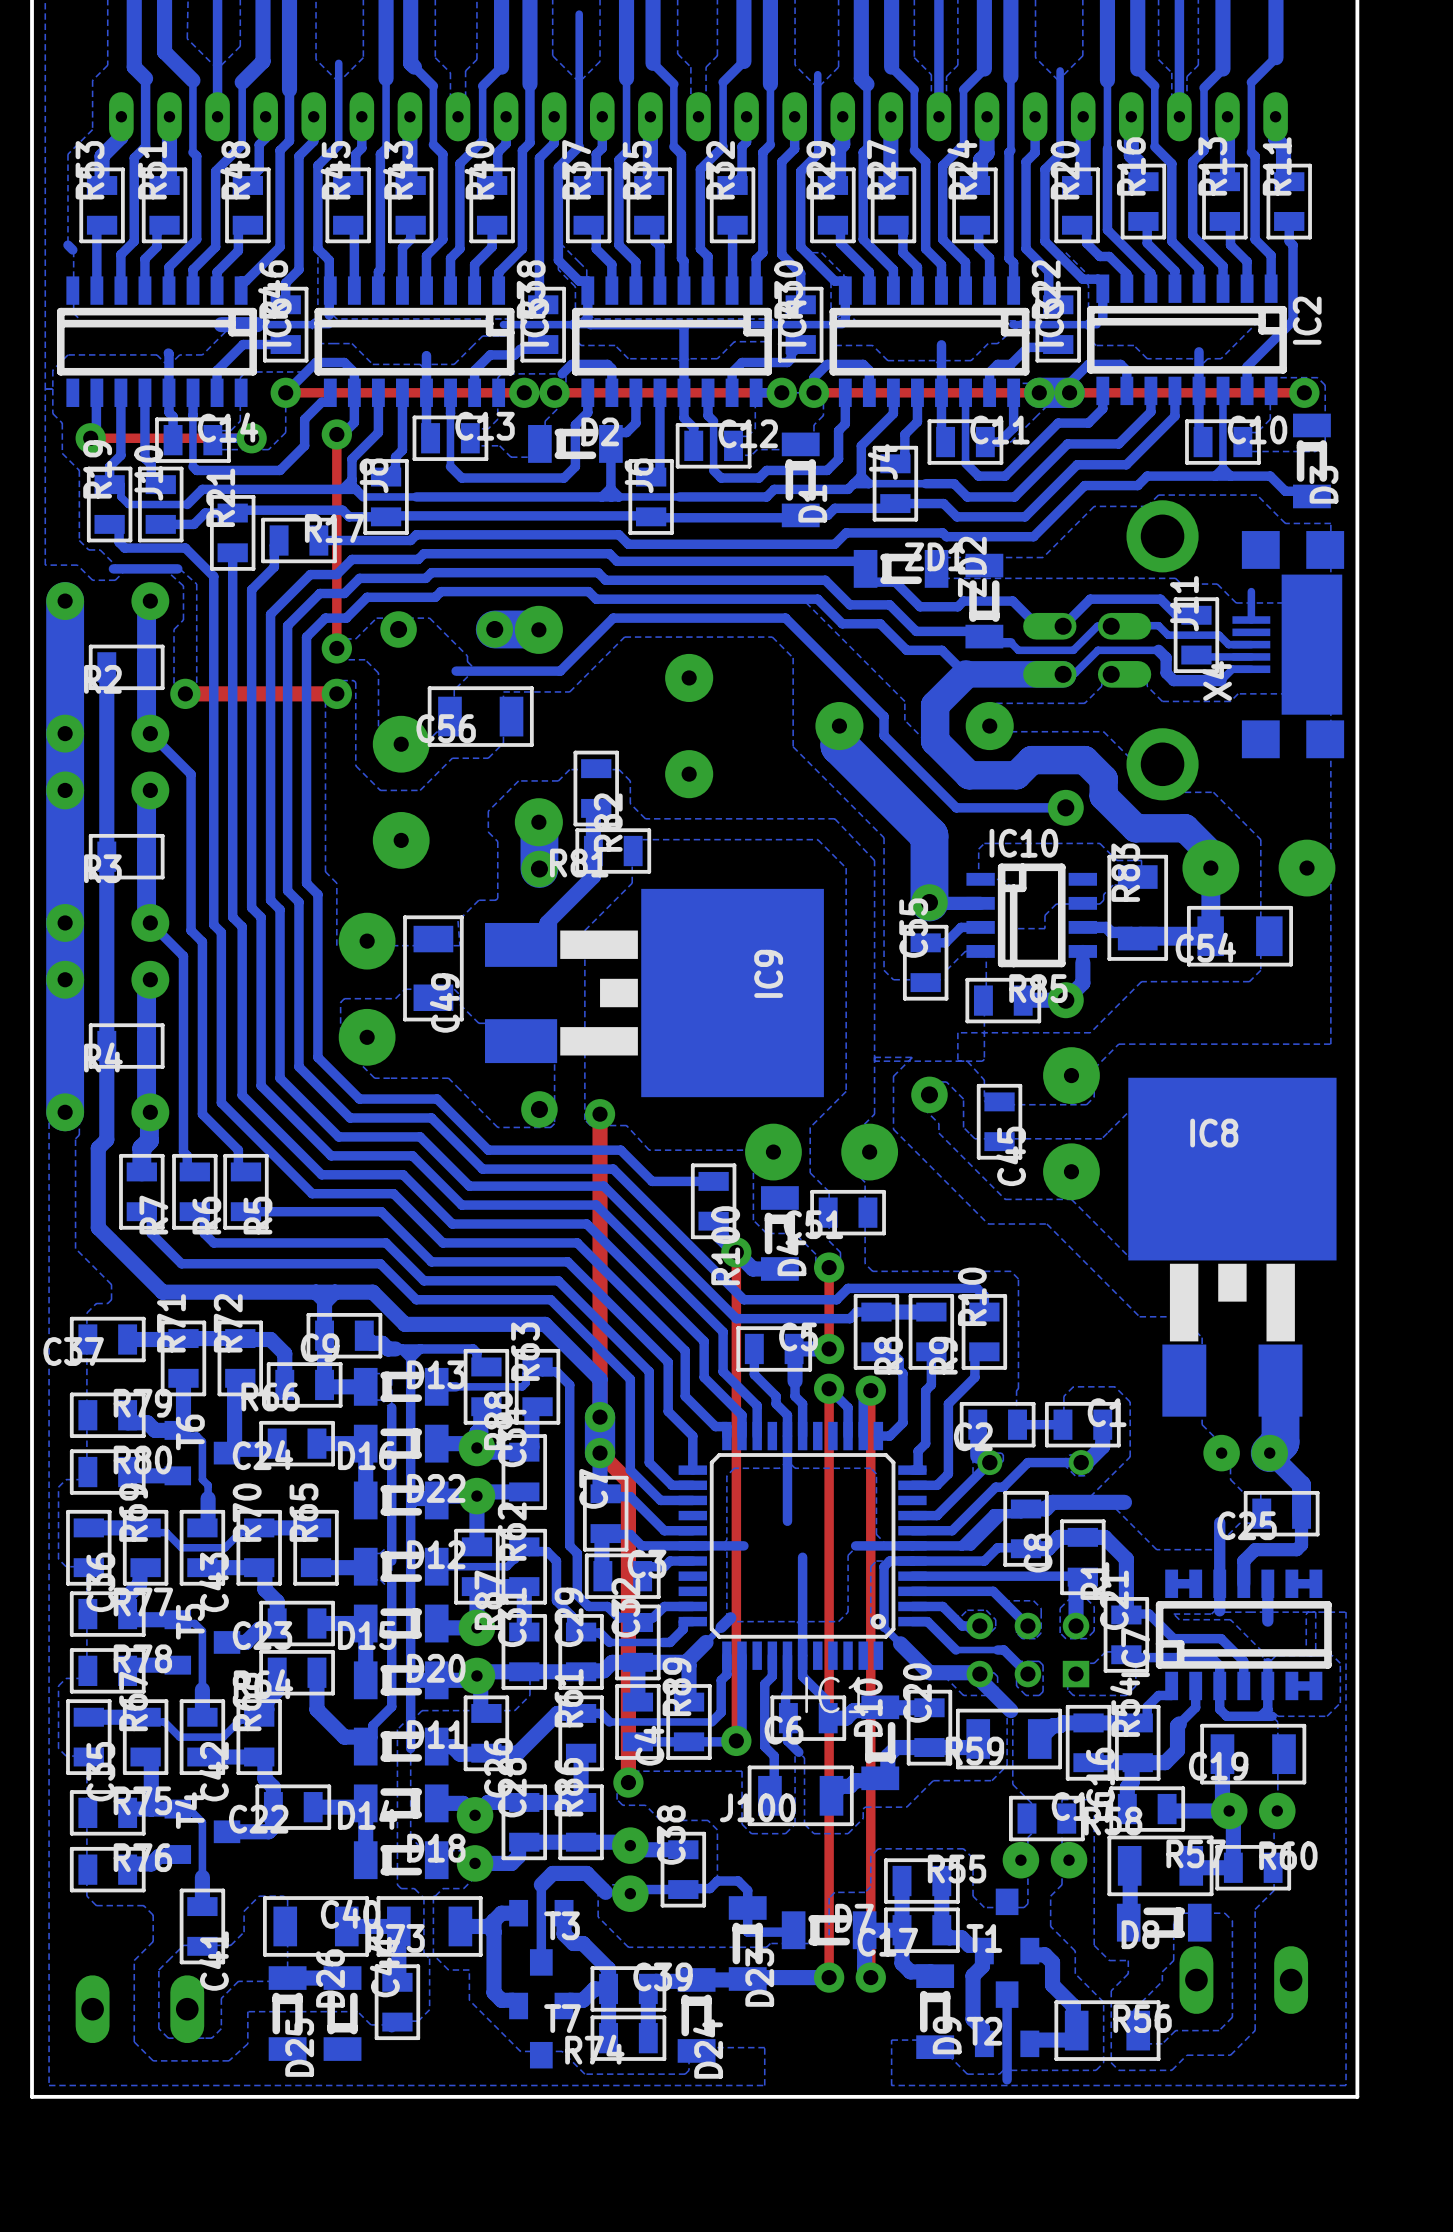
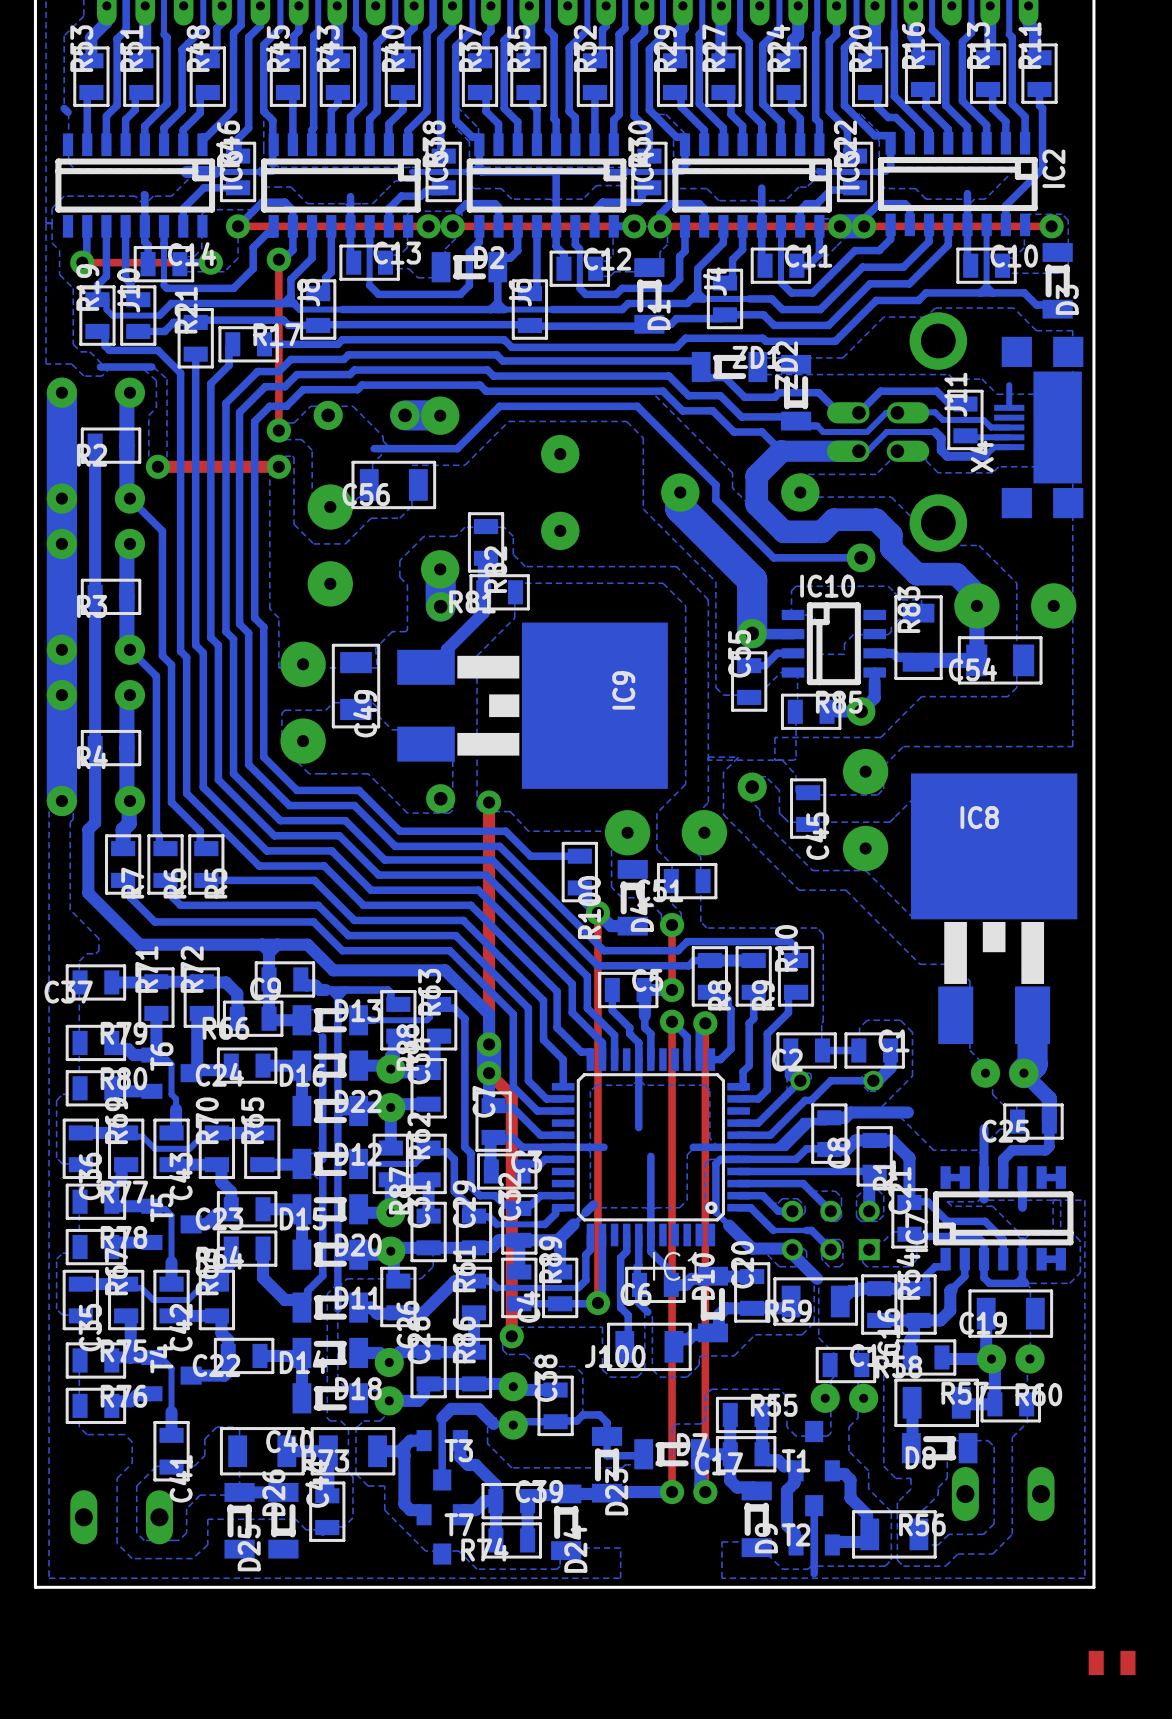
part: none -> (1112, 1662)

